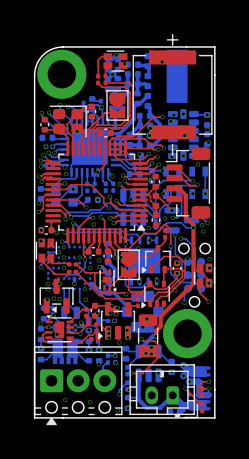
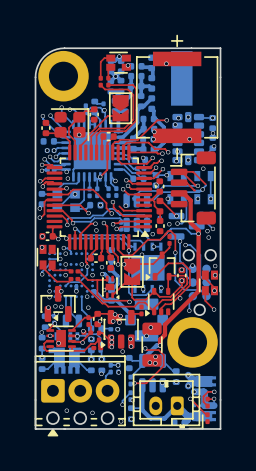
top track: none -> (179, 171) (193, 171) (205, 184)
bottom track: none -> (205, 184) (199, 192) (161, 192) (153, 200)
bottom track: (192, 181) (163, 180) (155, 188) (155, 206) -> none
bottom track: none -> (199, 185) (163, 185) (158, 190) (140, 190) (133, 200)
top track: (197, 184) (190, 185) -> none
bottom track: (189, 185) (175, 185) (170, 190) (170, 201) (159, 210) (159, 223) (155, 227) -> none
bottom track: (123, 195) (123, 202) (127, 206) (142, 206) (155, 220) -> none
bottom track: (143, 195) (143, 200) (155, 212) -> none
via: (130, 199) -> none
via: none -> (125, 205)
via: (116, 201) -> none
part position: (155, 224) -> (121, 225)

